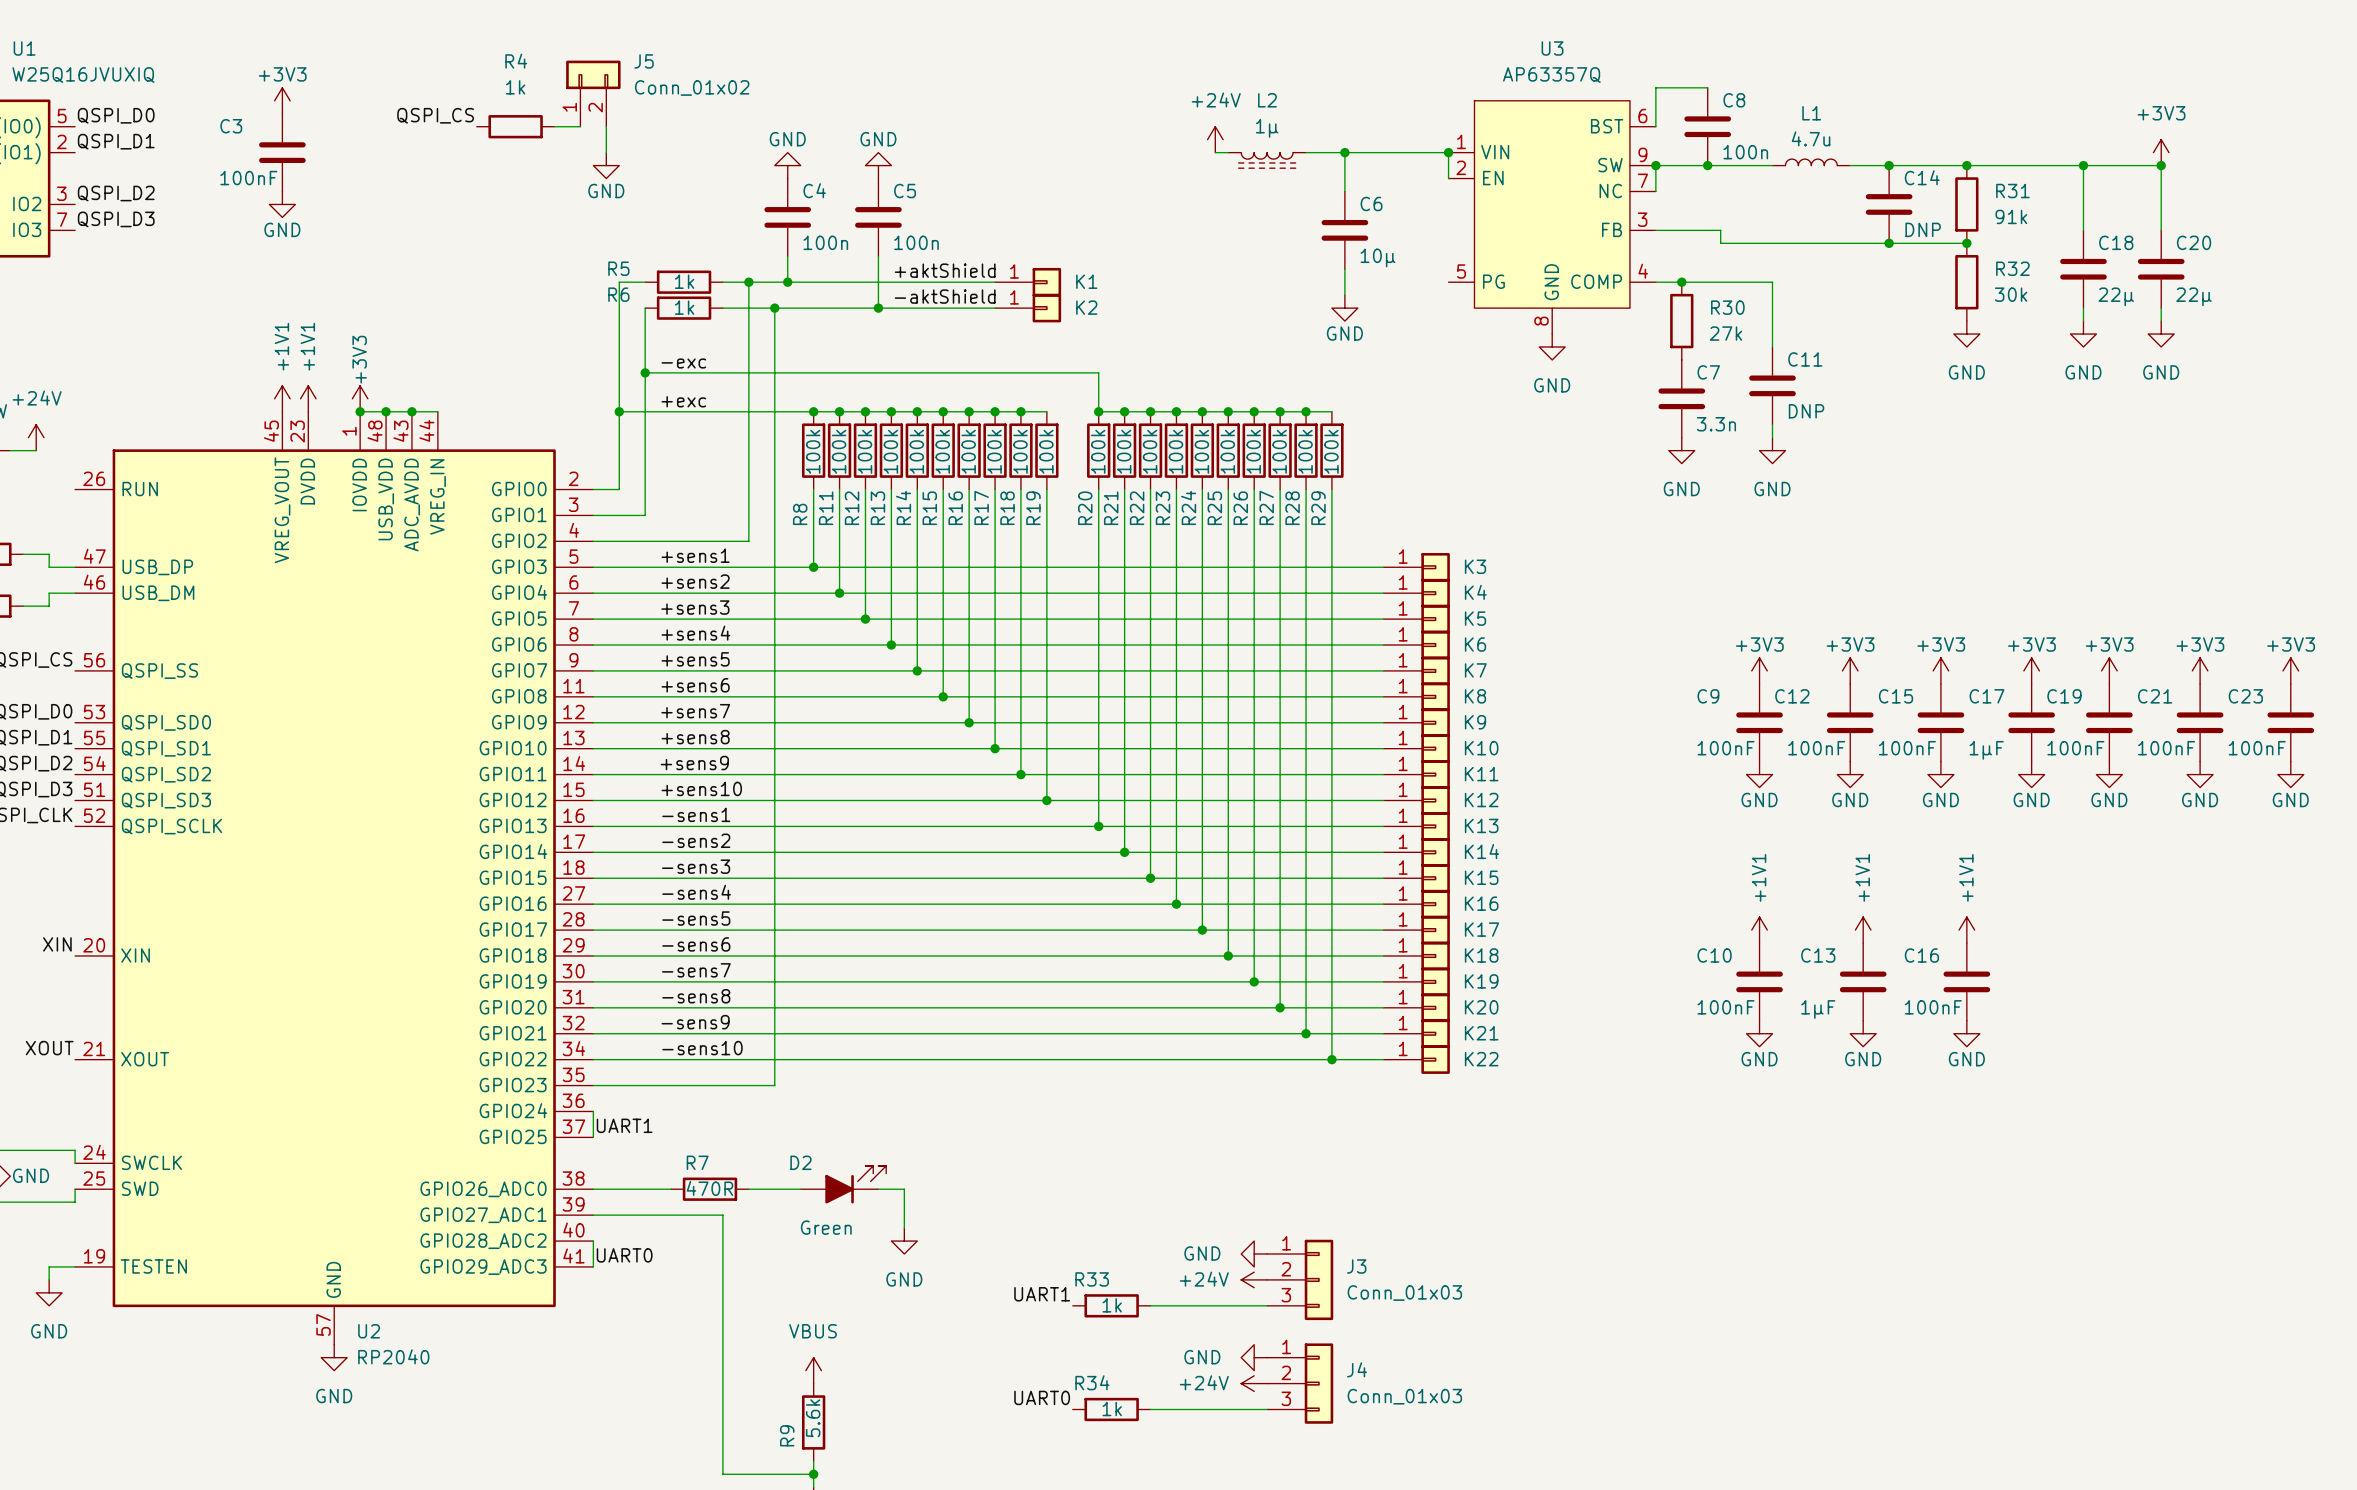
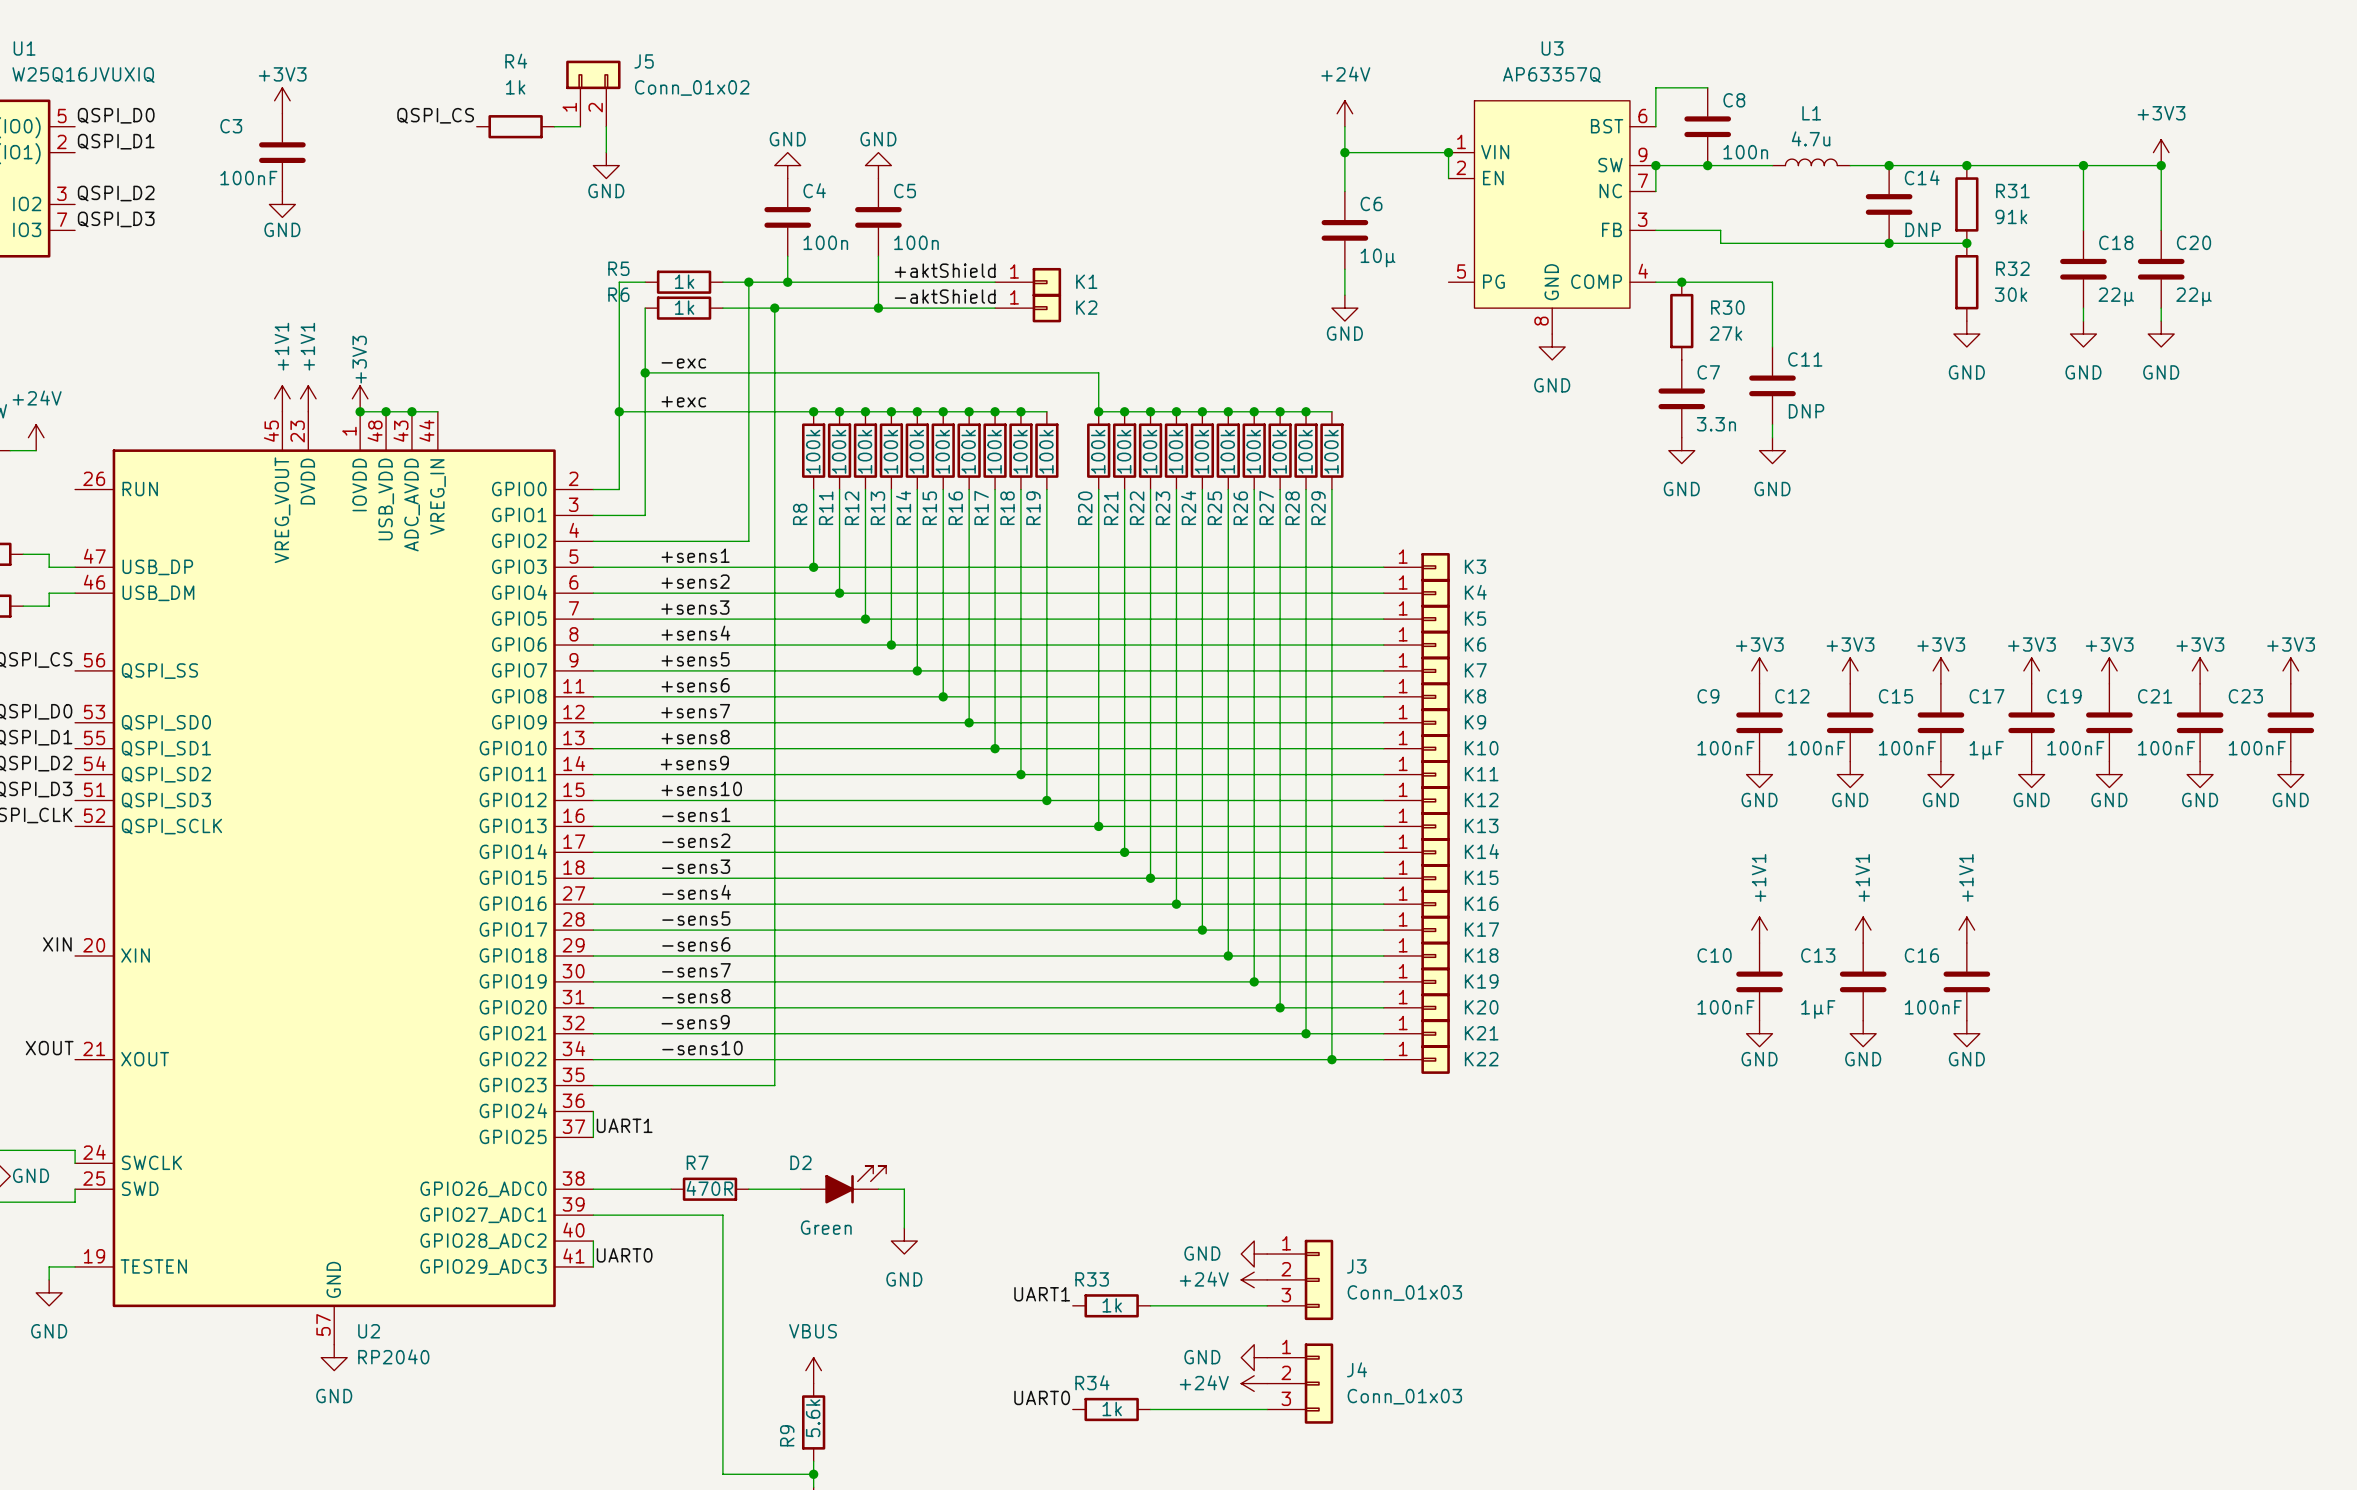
power symbol position: +24V (1215, 139) -> +24V (1344, 113)
wire: (1215, 152) (1228, 152) -> none
wire: (1306, 152) (1344, 152) -> (1344, 126) (1344, 152)
L2: 1µ (1267, 160) -> none

